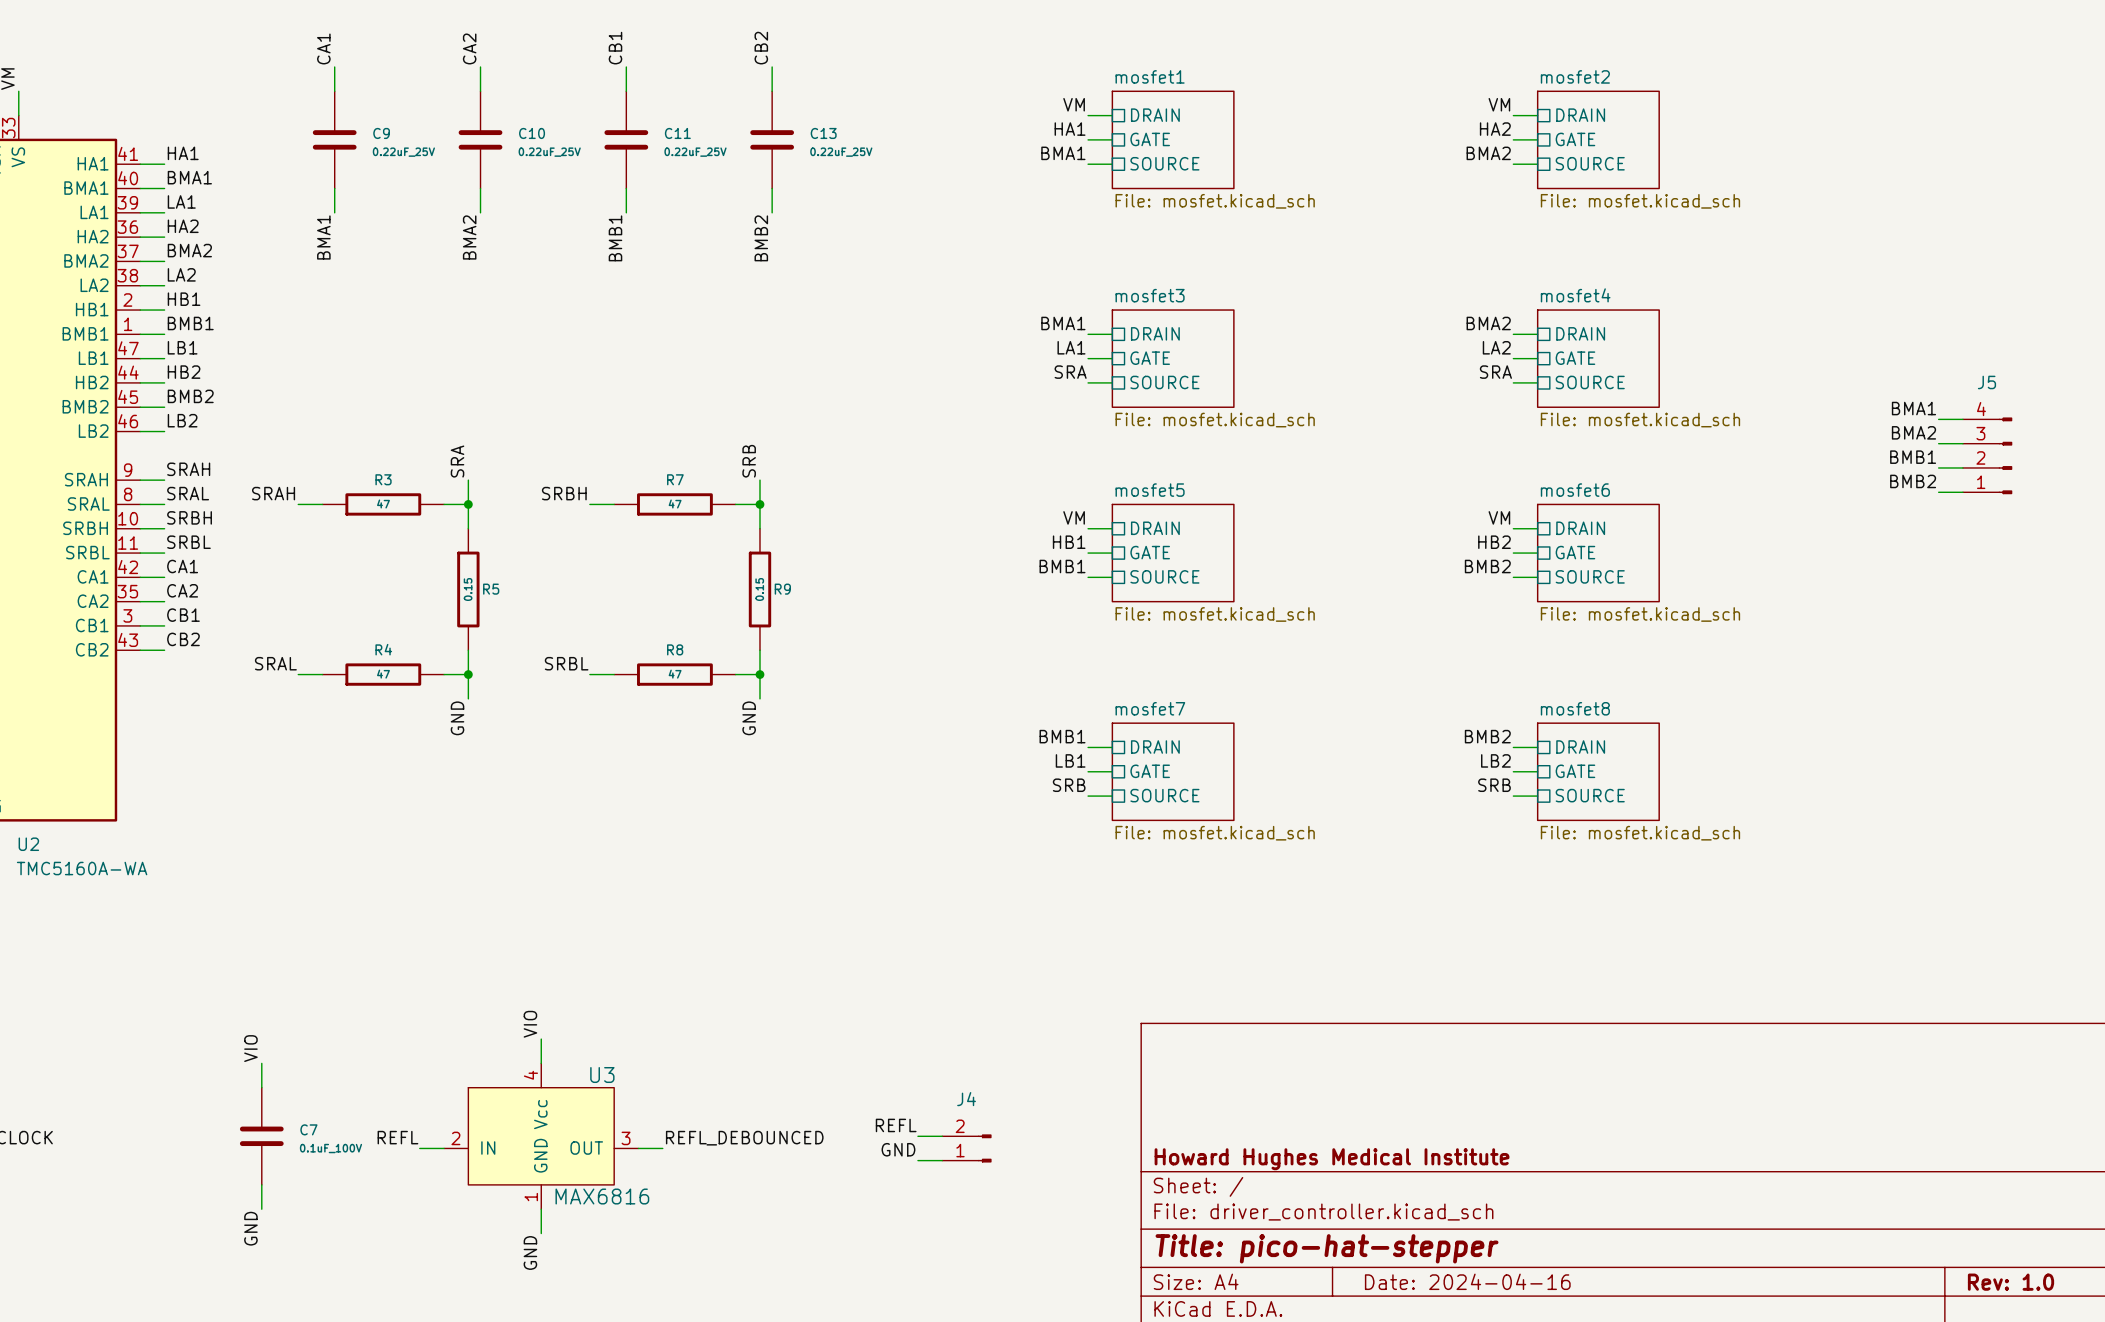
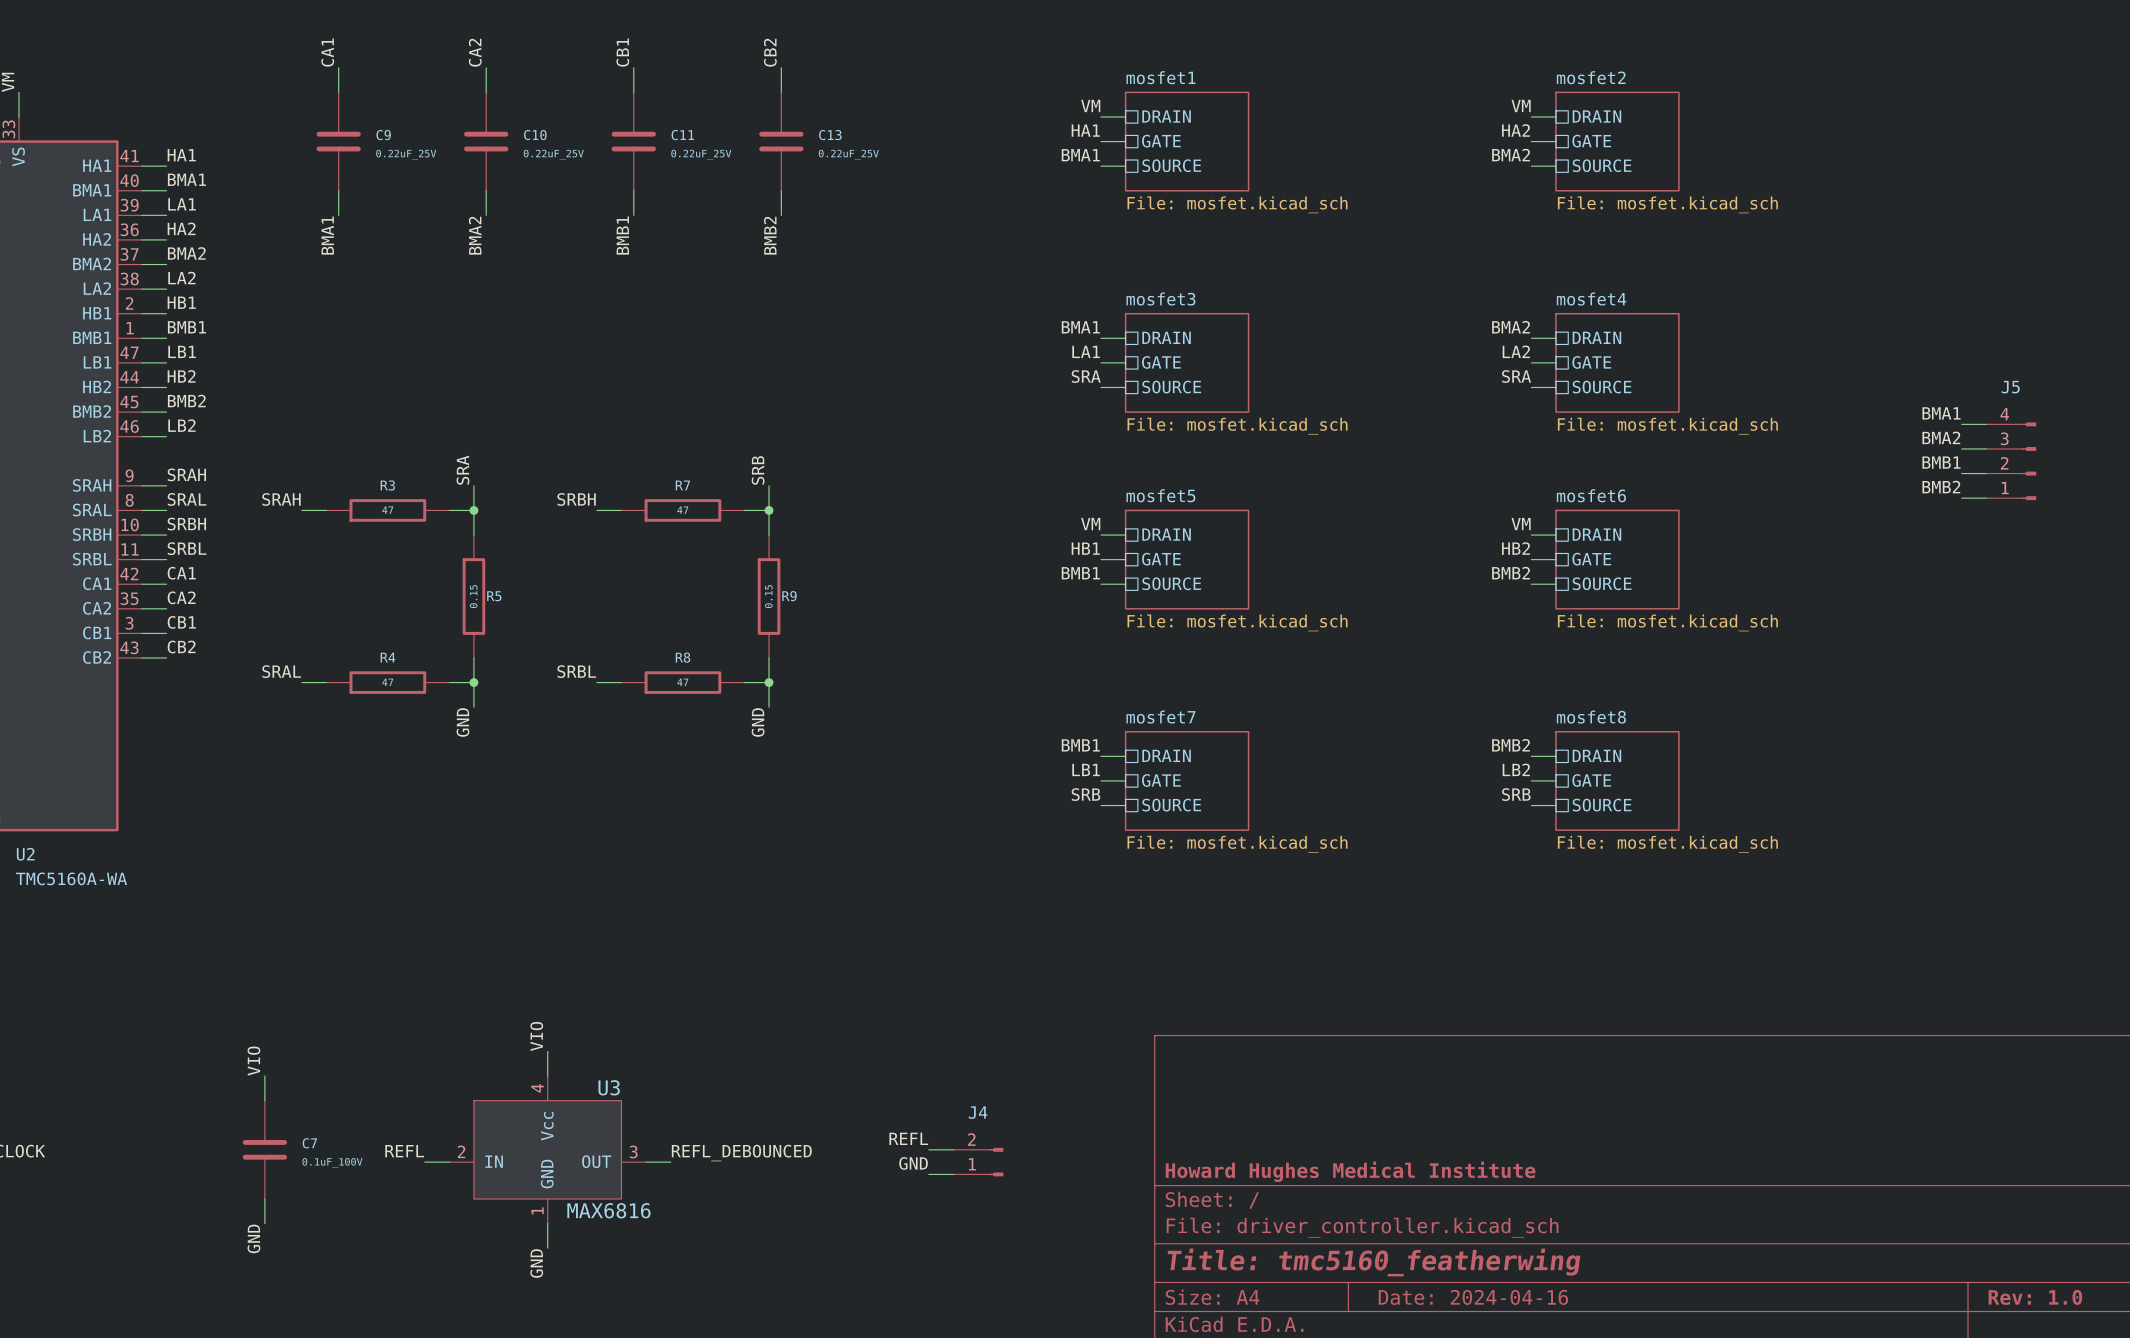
title block: Title: pico-hat-stepper (1327, 1248) -> Title: tmc5160_featherwing (1373, 1262)

